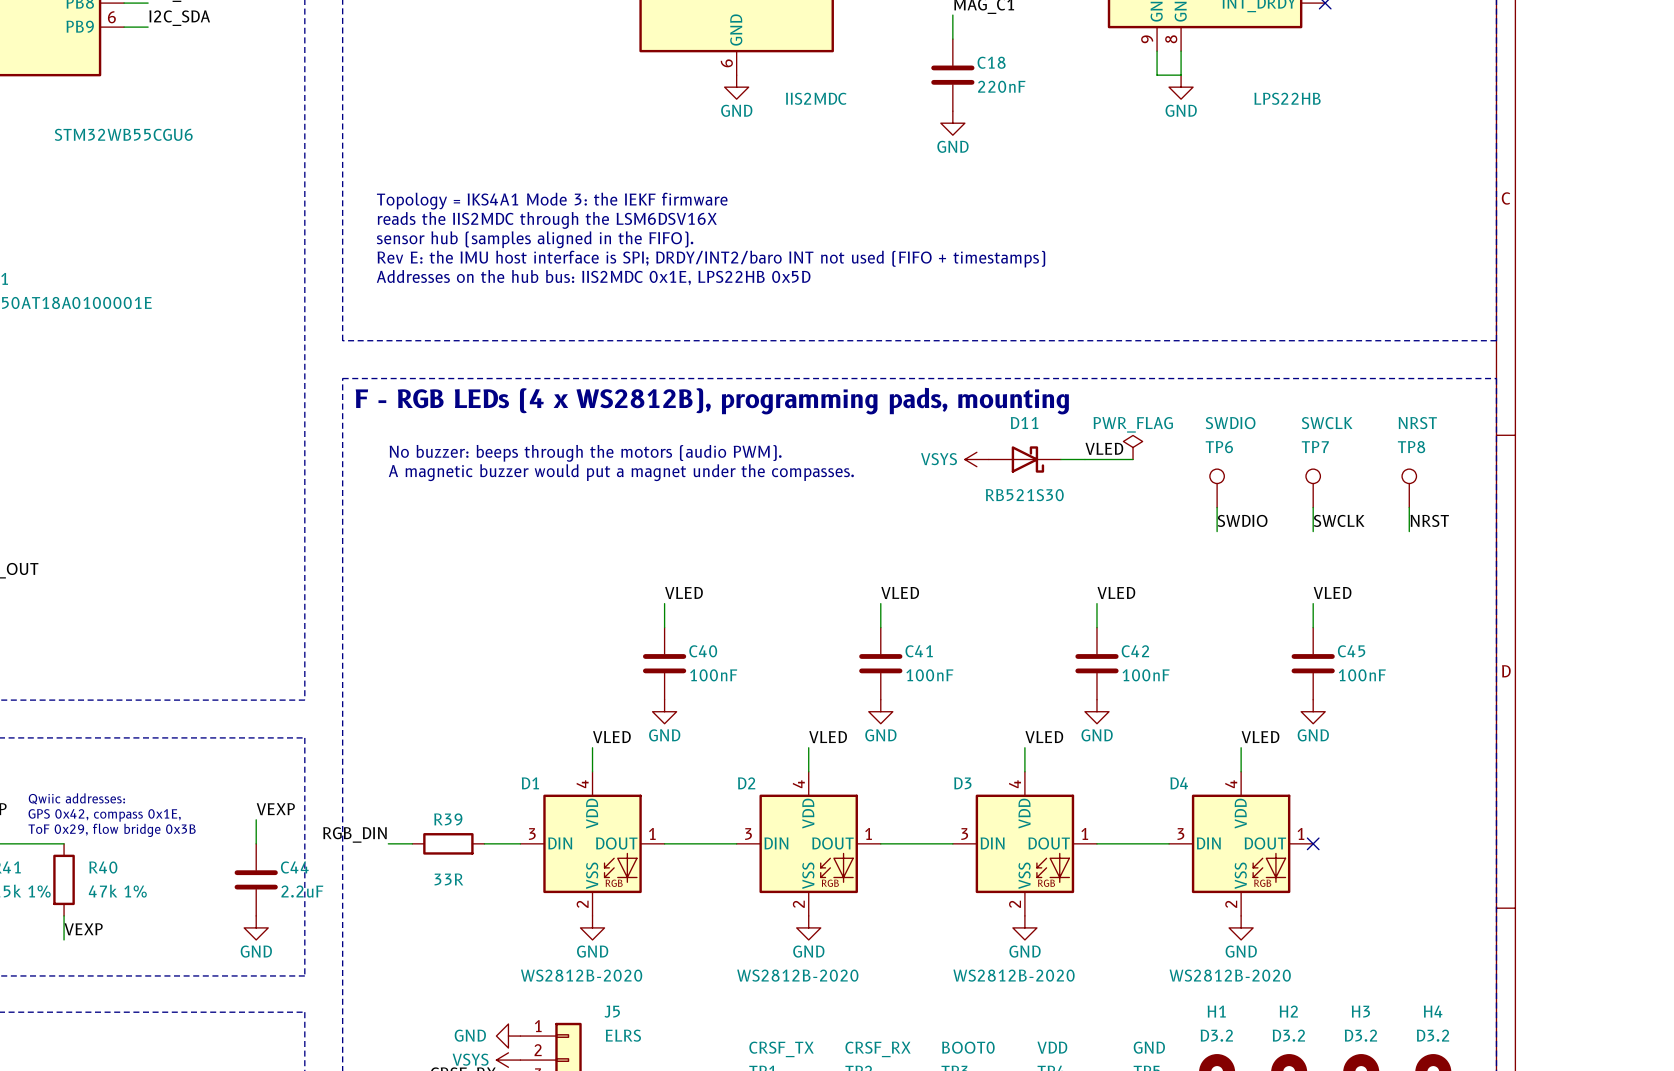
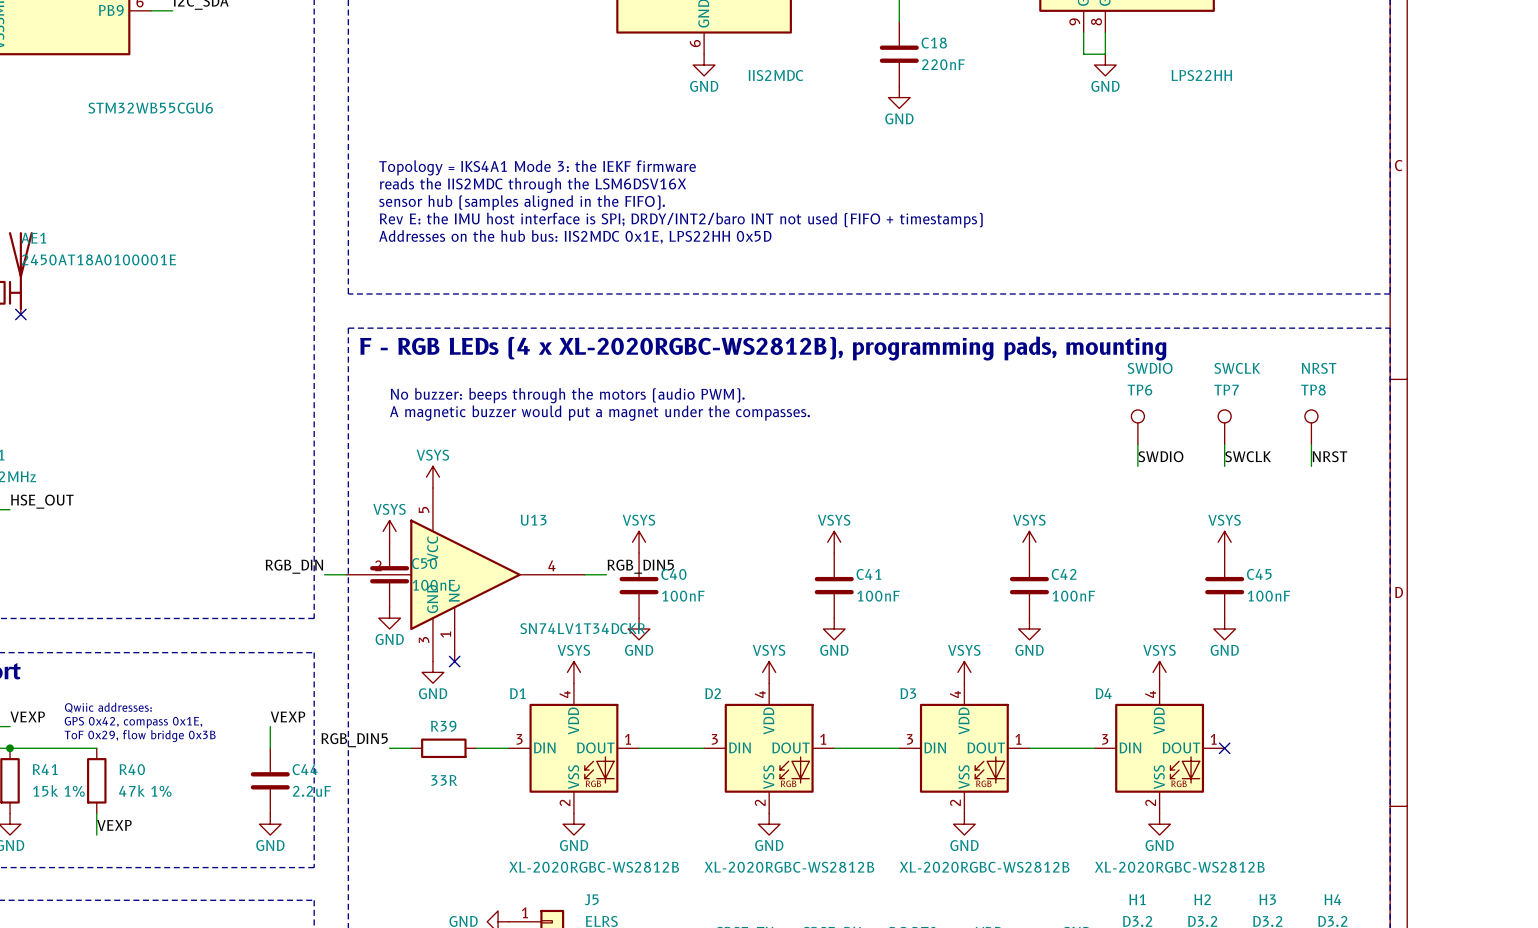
part value: LPS22HB (1287, 98) -> LPS22HH (1201, 75)
text: Addresses on the hub bus: IIS2MDC 0x1E, LPS22HB 0x5D (593, 277) -> Addresses on the hub bus: IIS2MDC 0x1E, LPS22HH 0x5D (575, 237)
text: F - RGB LEDs (4 x WS2812B), programming pads, mounting (712, 401) -> F - RGB LEDs (4 x XL-2020RGBC-WS2812B), programming pads, mounting (763, 348)
power symbol: PWR_FLAG (1133, 447) -> none
label: VLED (1104, 448) -> none
power symbol: VSYS (976, 459) -> none
D11: RB521S30 (1024, 459) -> none
wire: (1060, 459) (1133, 459) -> none
power symbol: none -> VSYS (432, 477)
label: VLED (683, 592) -> none
label: VLED (900, 592) -> none
label: VLED (1116, 592) -> none
label: VLED (1332, 592) -> none
power symbol: none -> VSYS (389, 531)
power symbol: none -> VSYS (639, 542)
power symbol: none -> VSYS (834, 542)
power symbol: none -> VSYS (1029, 542)
power symbol: none -> VSYS (1224, 542)
label: none -> RGB_DIN (294, 566)
label: none -> RGB_DIN5 (640, 566)
wire: none -> (324, 574) (346, 574)
C50: none -> 100nF (389, 574)
U13: none -> SN74LV1T34DCKR (465, 574)
wire: none -> (584, 574) (606, 574)
power symbol: none -> GND (389, 618)
label: VLED (611, 737) -> none
label: VLED (828, 737) -> none
label: VLED (1044, 737) -> none
label: VLED (1260, 737) -> none
no-connect mark: none -> (454, 661)
power symbol: none -> GND (432, 672)
power symbol: none -> VSYS (573, 672)
power symbol: none -> VSYS (769, 672)
power symbol: none -> VSYS (964, 672)
power symbol: none -> VSYS (1159, 672)
label: RGB_DIN (354, 834) -> RGB_DIN5 (354, 740)
D1 value: WS2812B-2020 (581, 975) -> XL-2020RGBC-WS2812B (594, 867)
D2 value: WS2812B-2020 (797, 975) -> XL-2020RGBC-WS2812B (789, 867)
D3 value: WS2812B-2020 (1014, 975) -> XL-2020RGBC-WS2812B (984, 867)
D4 value: WS2812B-2020 (1230, 975) -> XL-2020RGBC-WS2812B (1179, 867)

